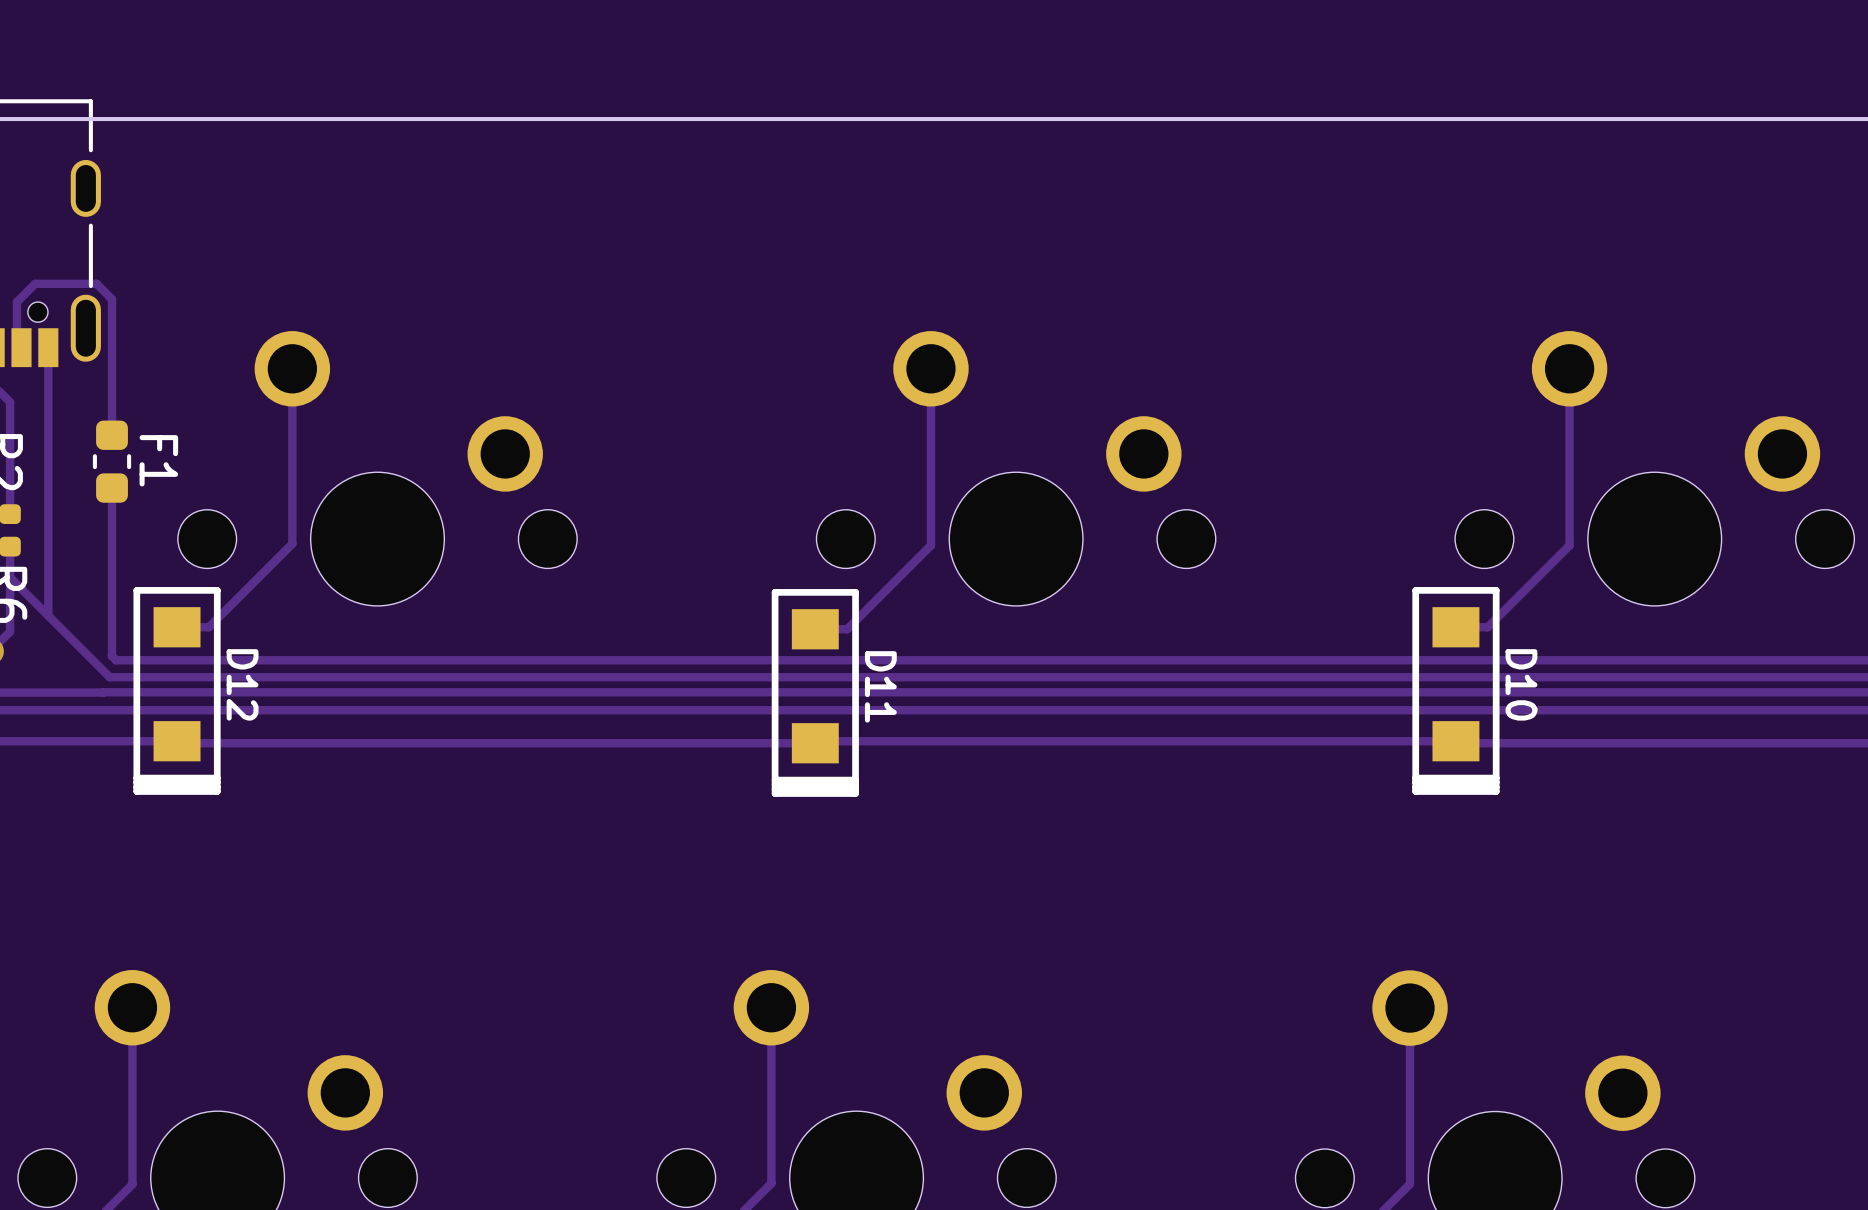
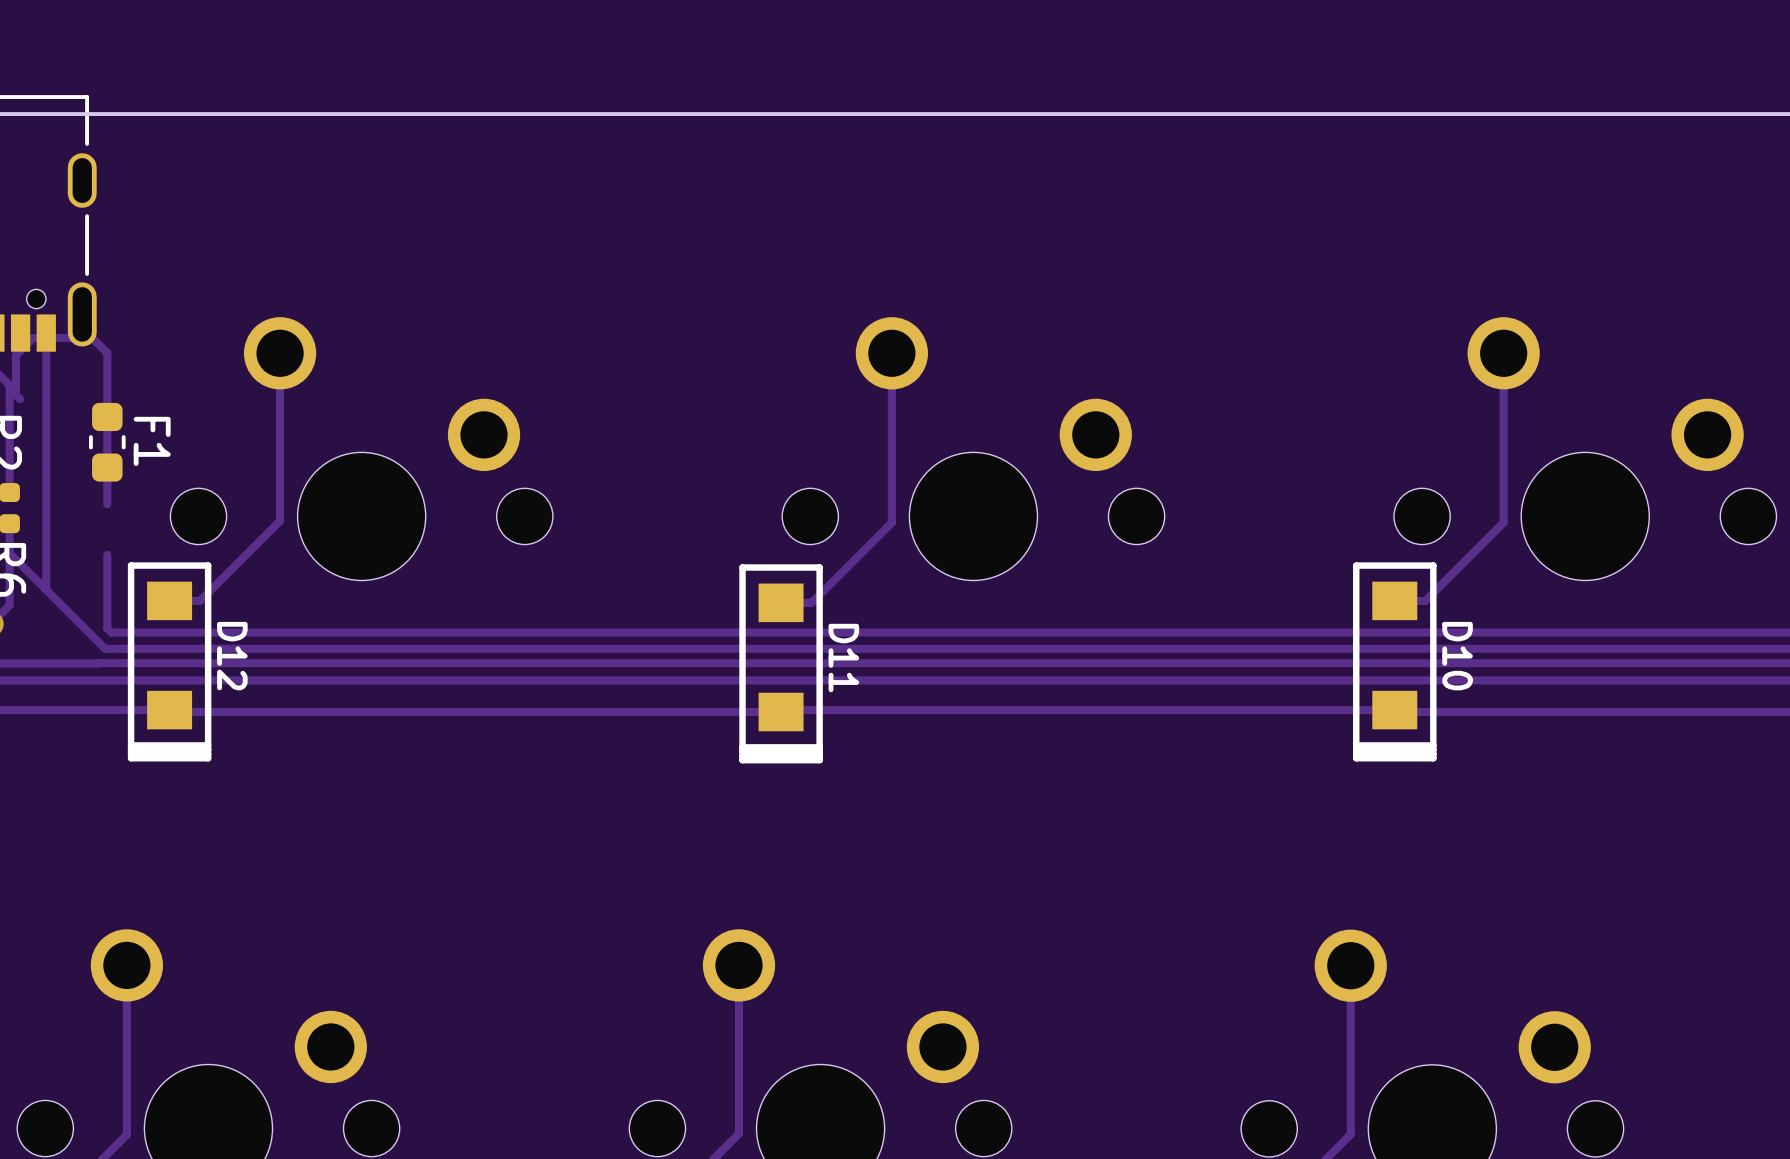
track: (21, 347) (16, 343) (16, 302) (35, 283) (96, 283) (112, 299) (112, 368) -> (20, 399) (15, 394) (15, 355) (33, 338) (92, 338) (107, 353)
track: none -> (107, 416) (107, 457)
track: (112, 526) (112, 579) -> none

